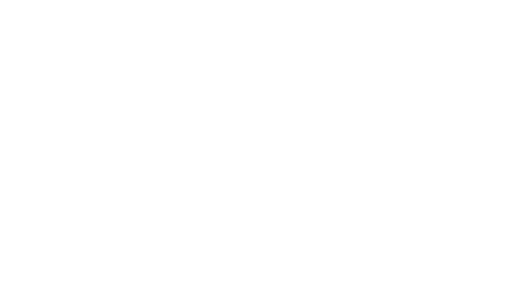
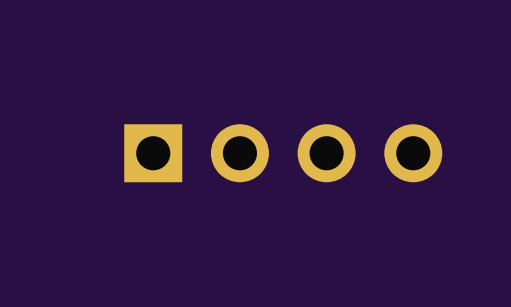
part: none -> (283, 153)

